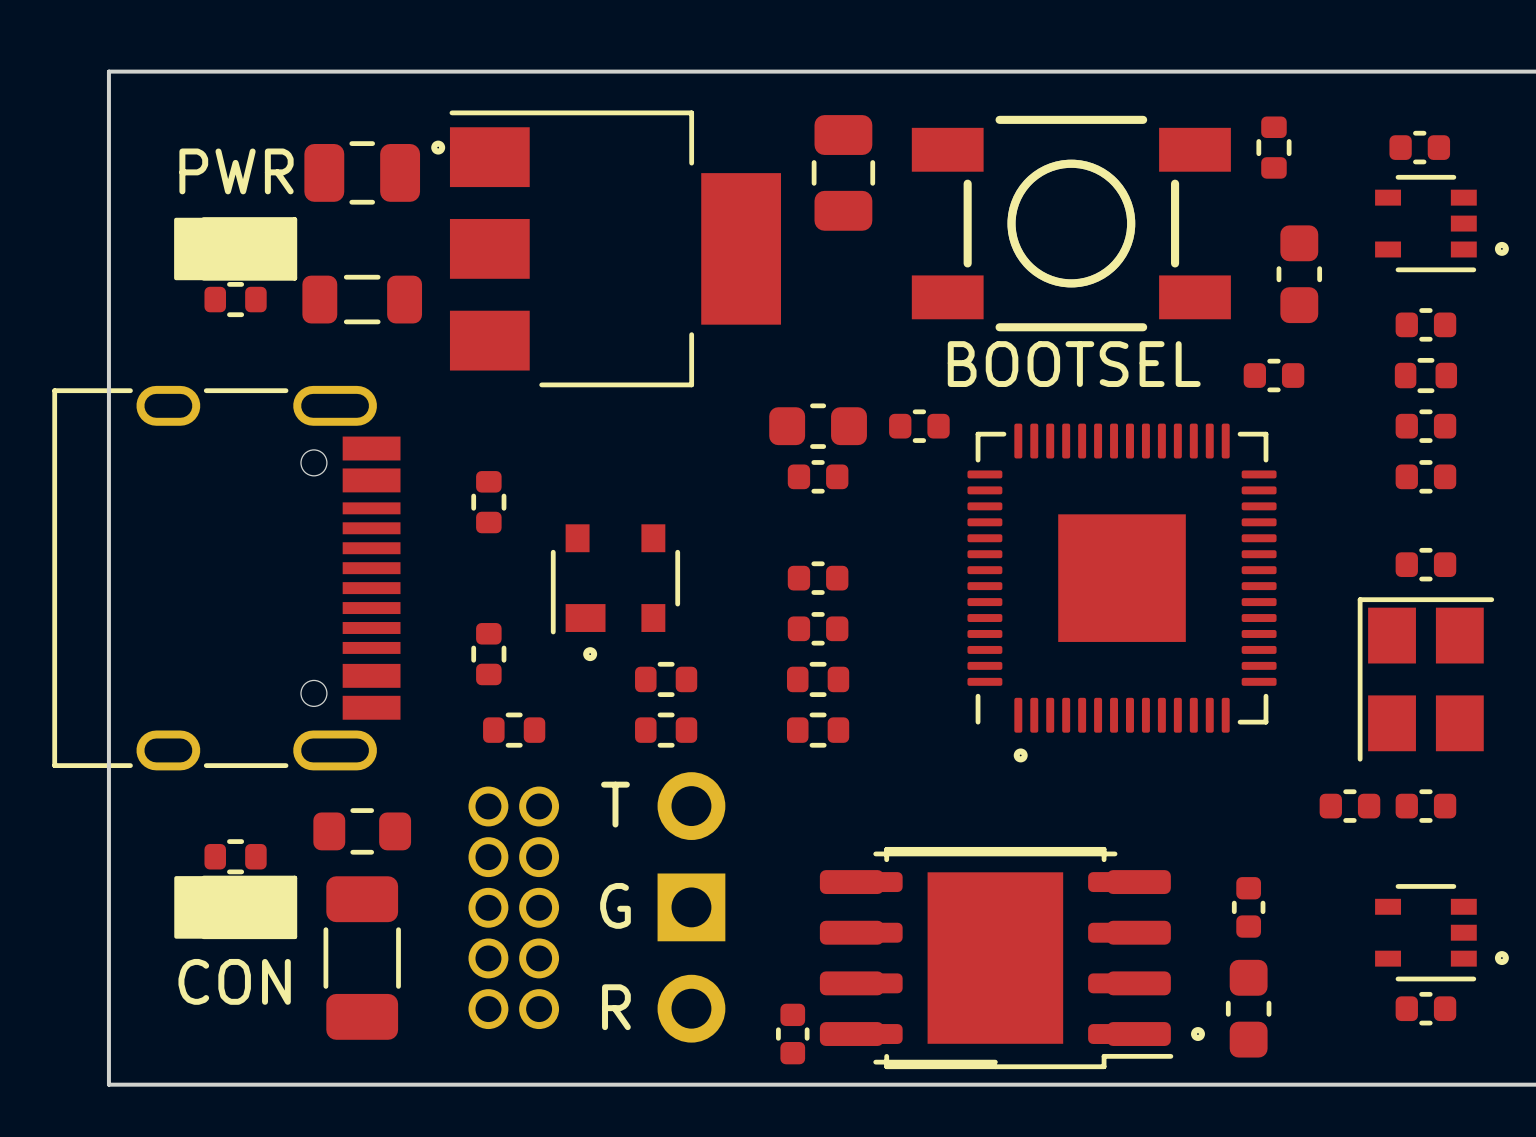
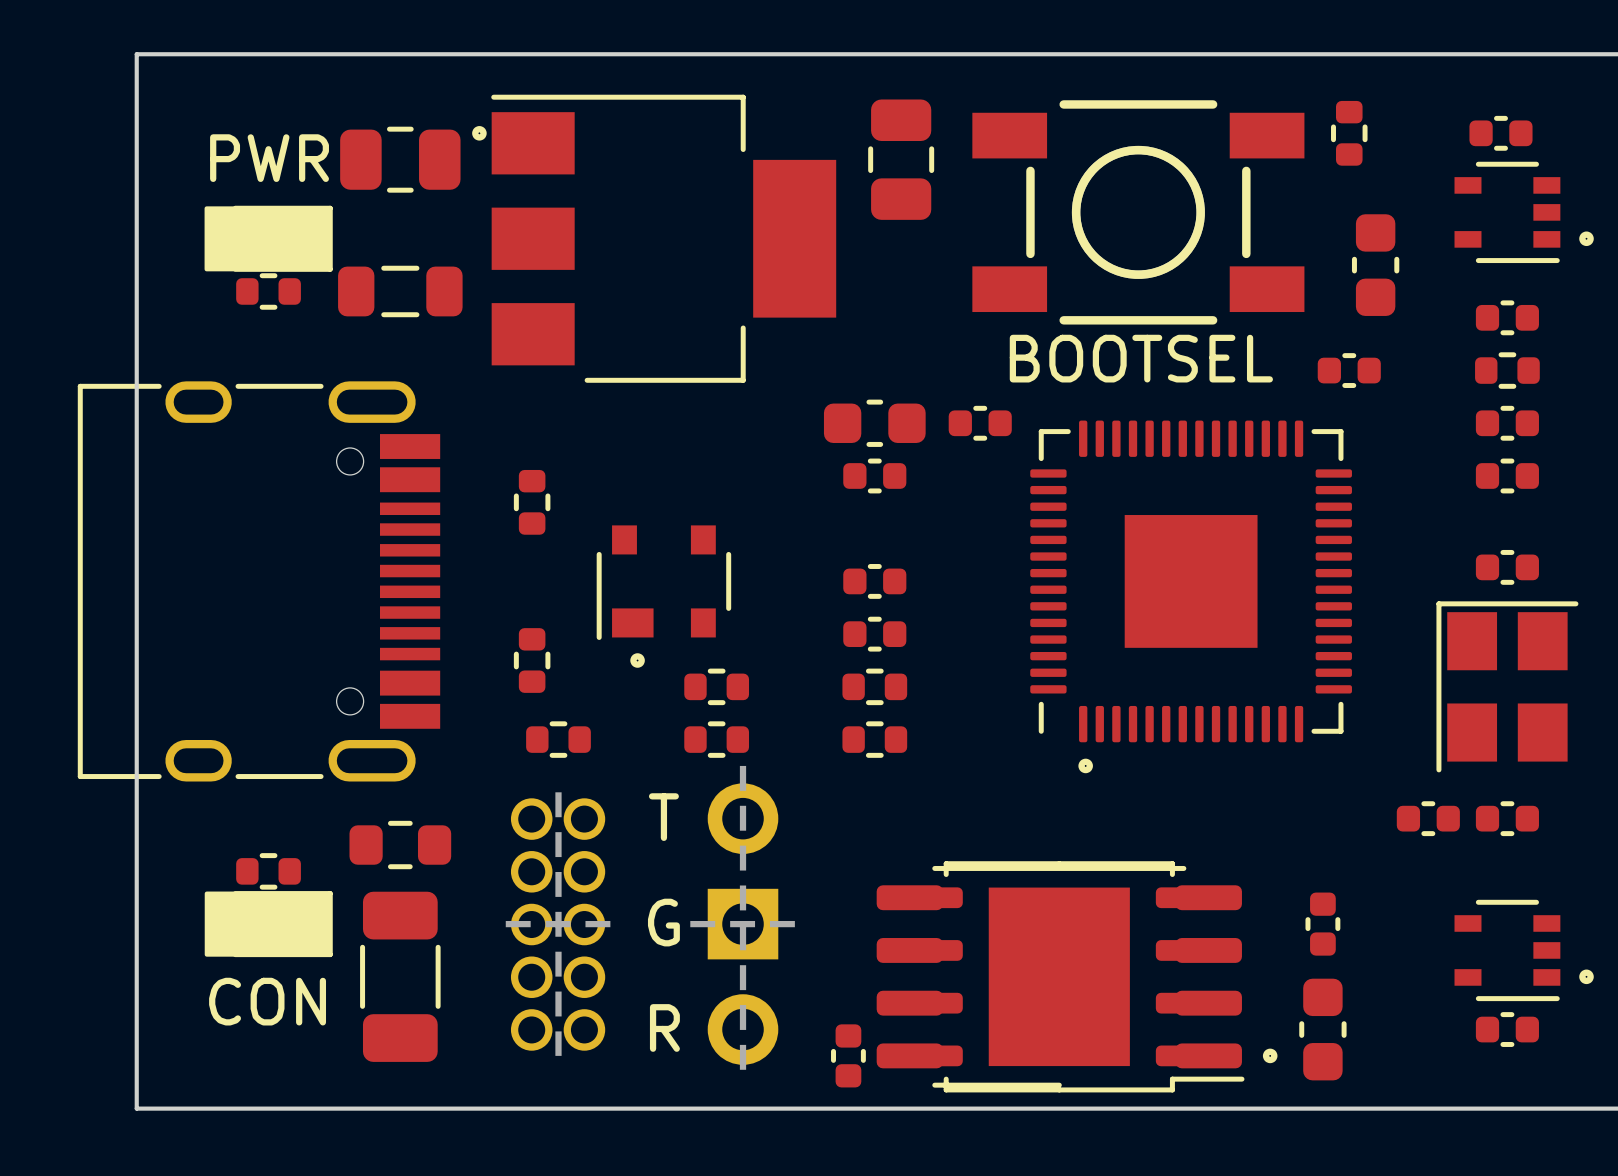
line: none -> (743, 765) (743, 1082)
line: none -> (558, 792) (558, 1055)
line: none -> (505, 924) (611, 924)
line: none -> (690, 924) (795, 924)

